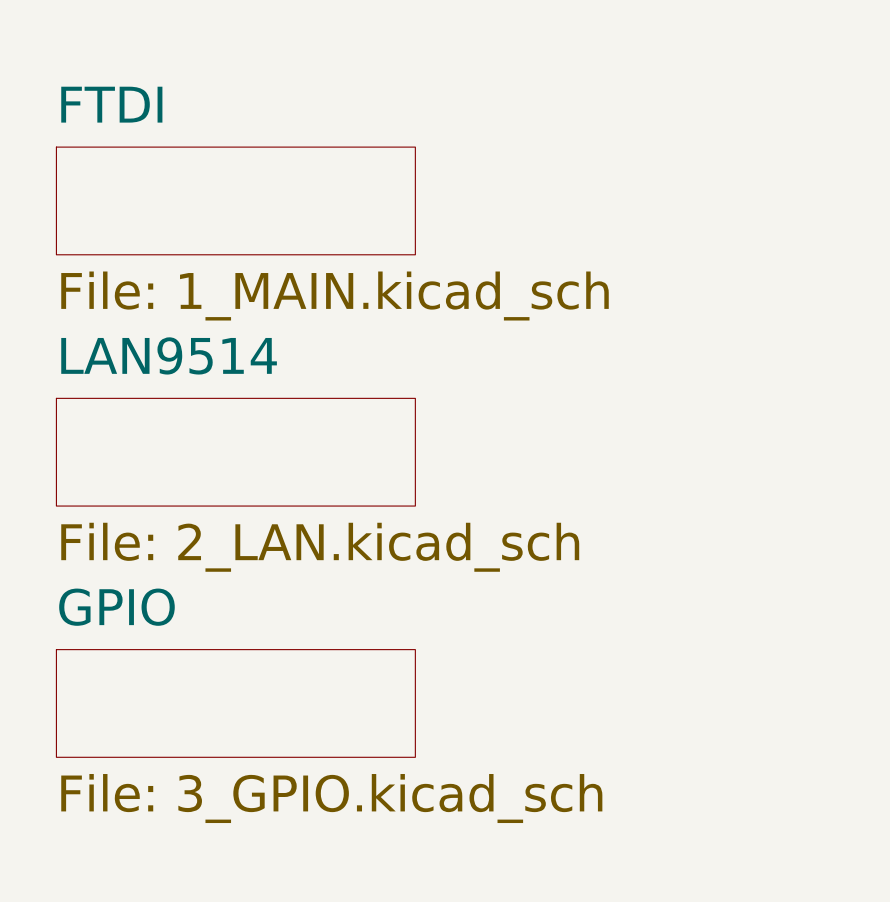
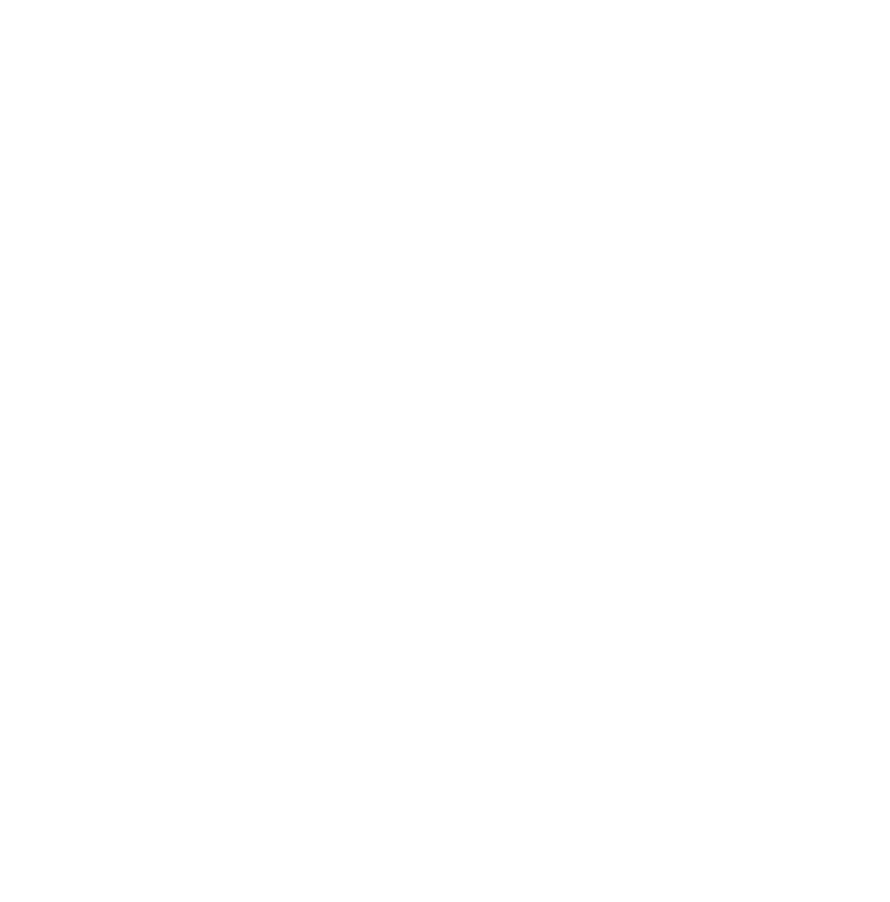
sheet FTDI: File: 1_MAIN.kicad_sch (235, 200) -> none
sheet LAN9514: File: 2_LAN.kicad_sch (235, 452) -> none
sheet GPIO: File: 3_GPIO.kicad_sch (235, 703) -> none

